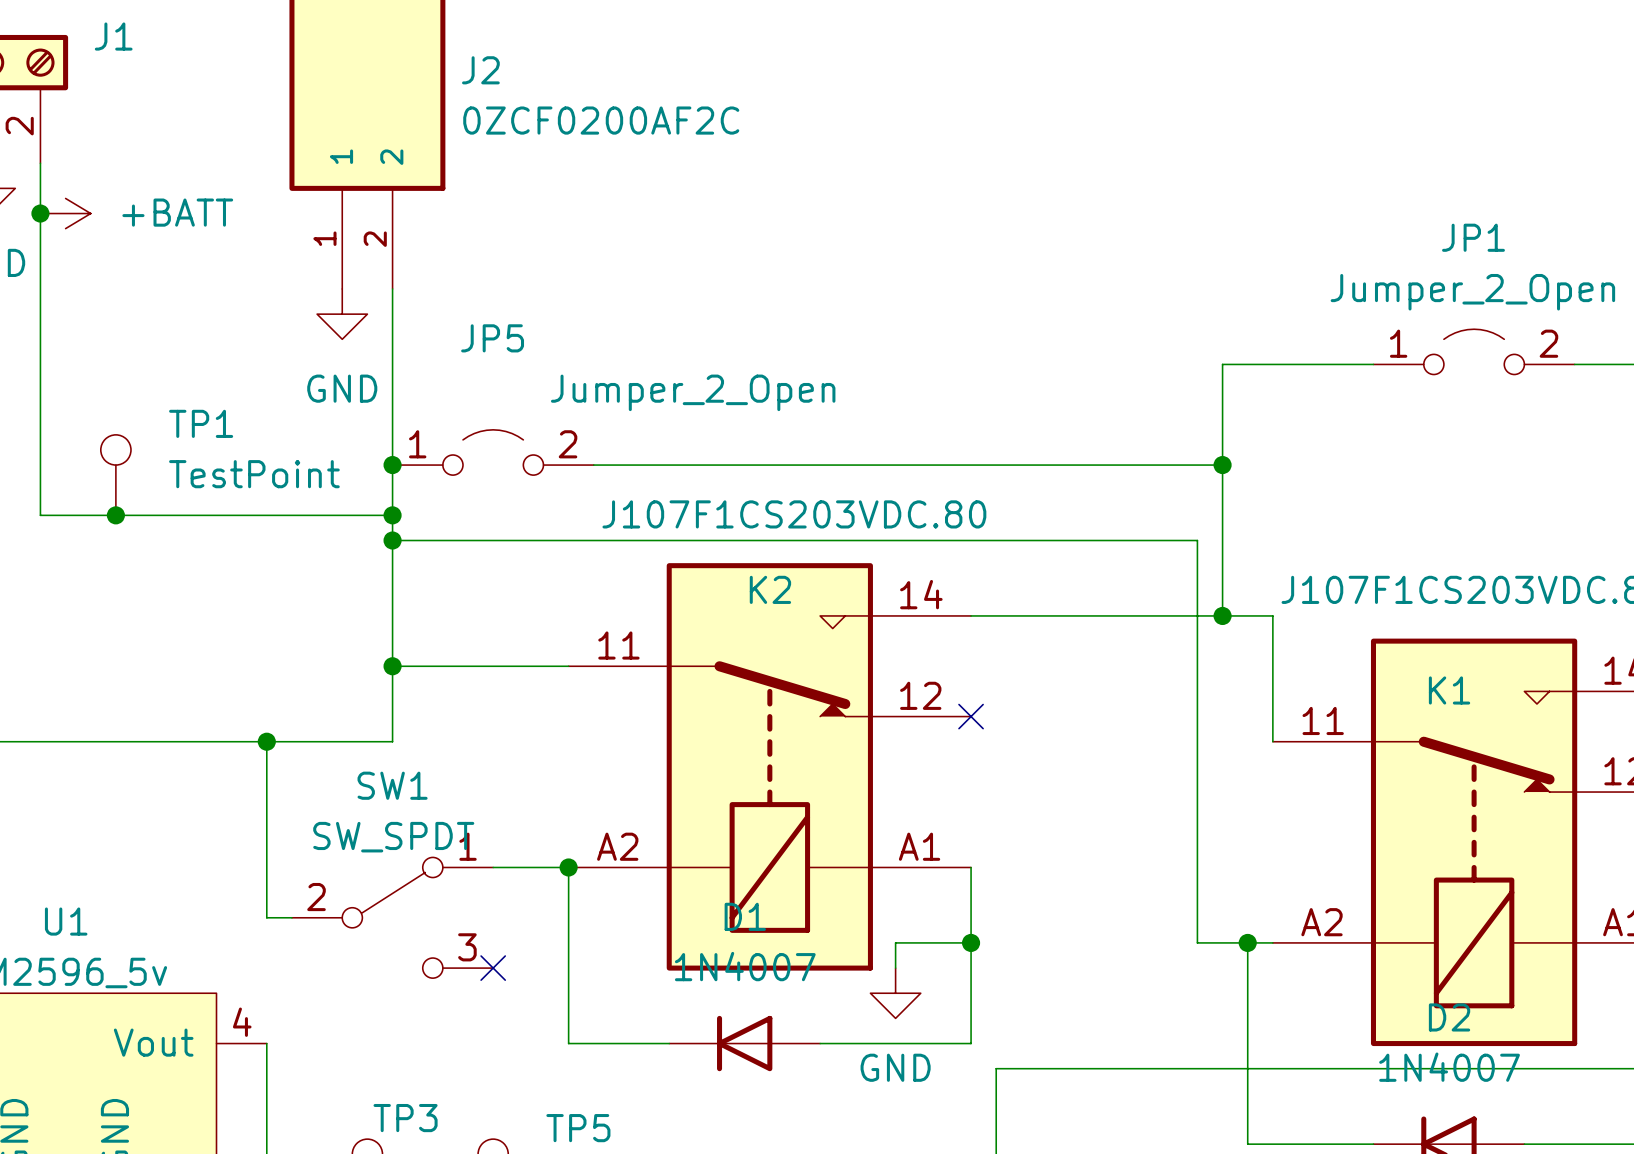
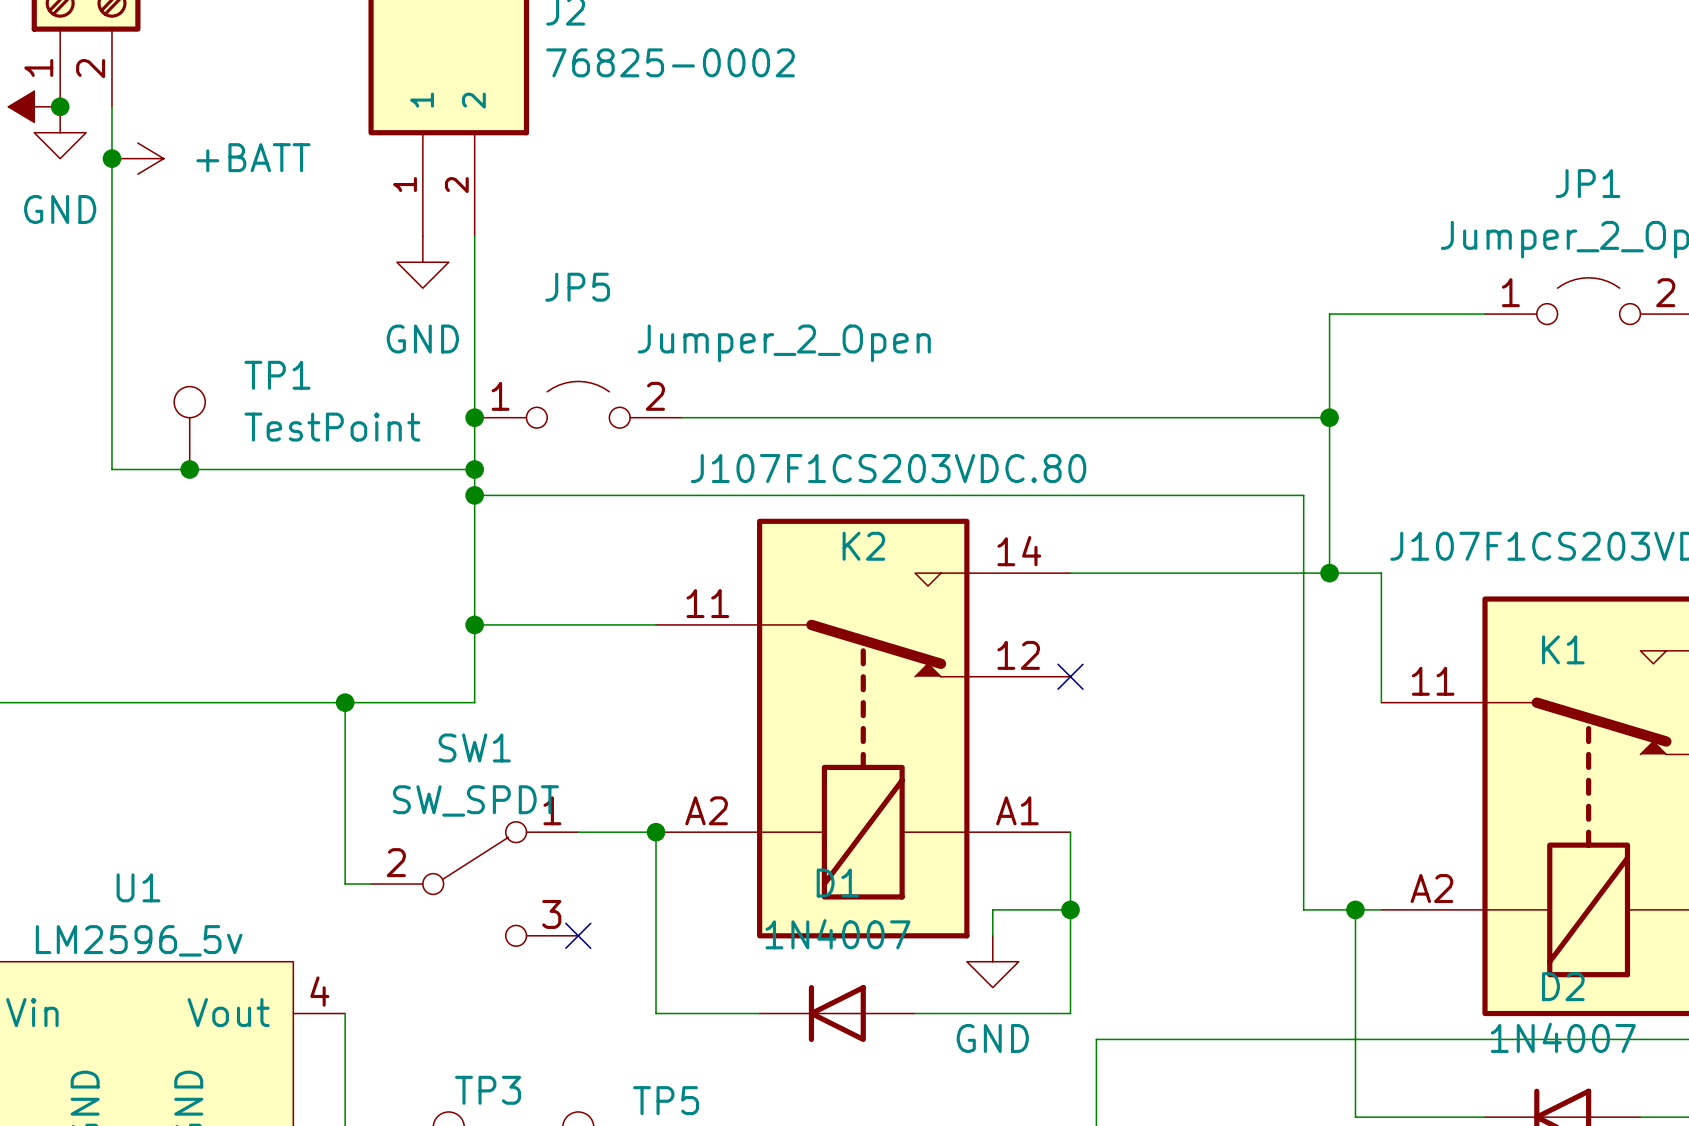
J2 value: 0ZCF0200AF2C (601, 120) -> 76825-0002 (670, 62)

